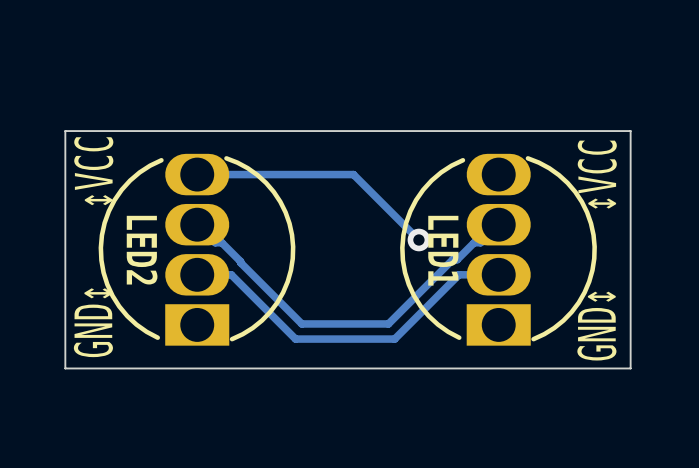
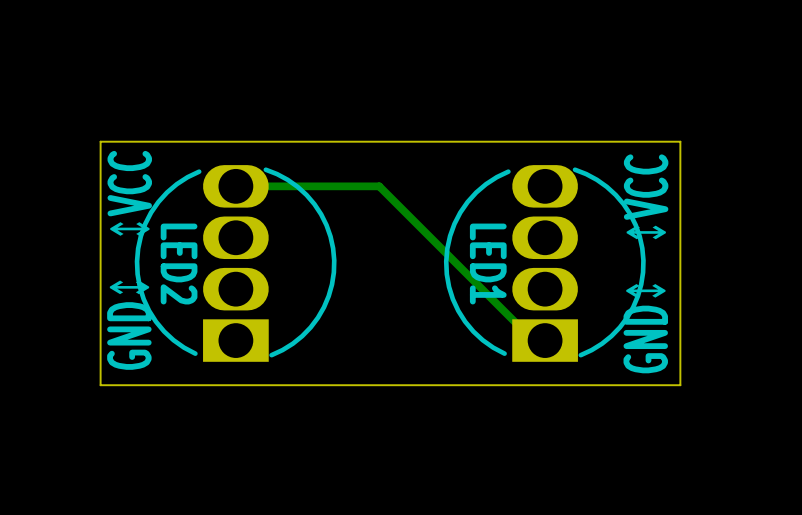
track: (337, 174) (353, 174) (418, 239) -> (379, 186) (533, 340) (545, 340)
track: (498, 224) (480, 242) (474, 242) (457, 259) (452, 259) (388, 323) (301, 323) (221, 242) (215, 242) (197, 224) -> none
via: (418, 239) -> none
track: (202, 269) (197, 274) (231, 274) (295, 339) (394, 339) (458, 274) (498, 274) -> none

